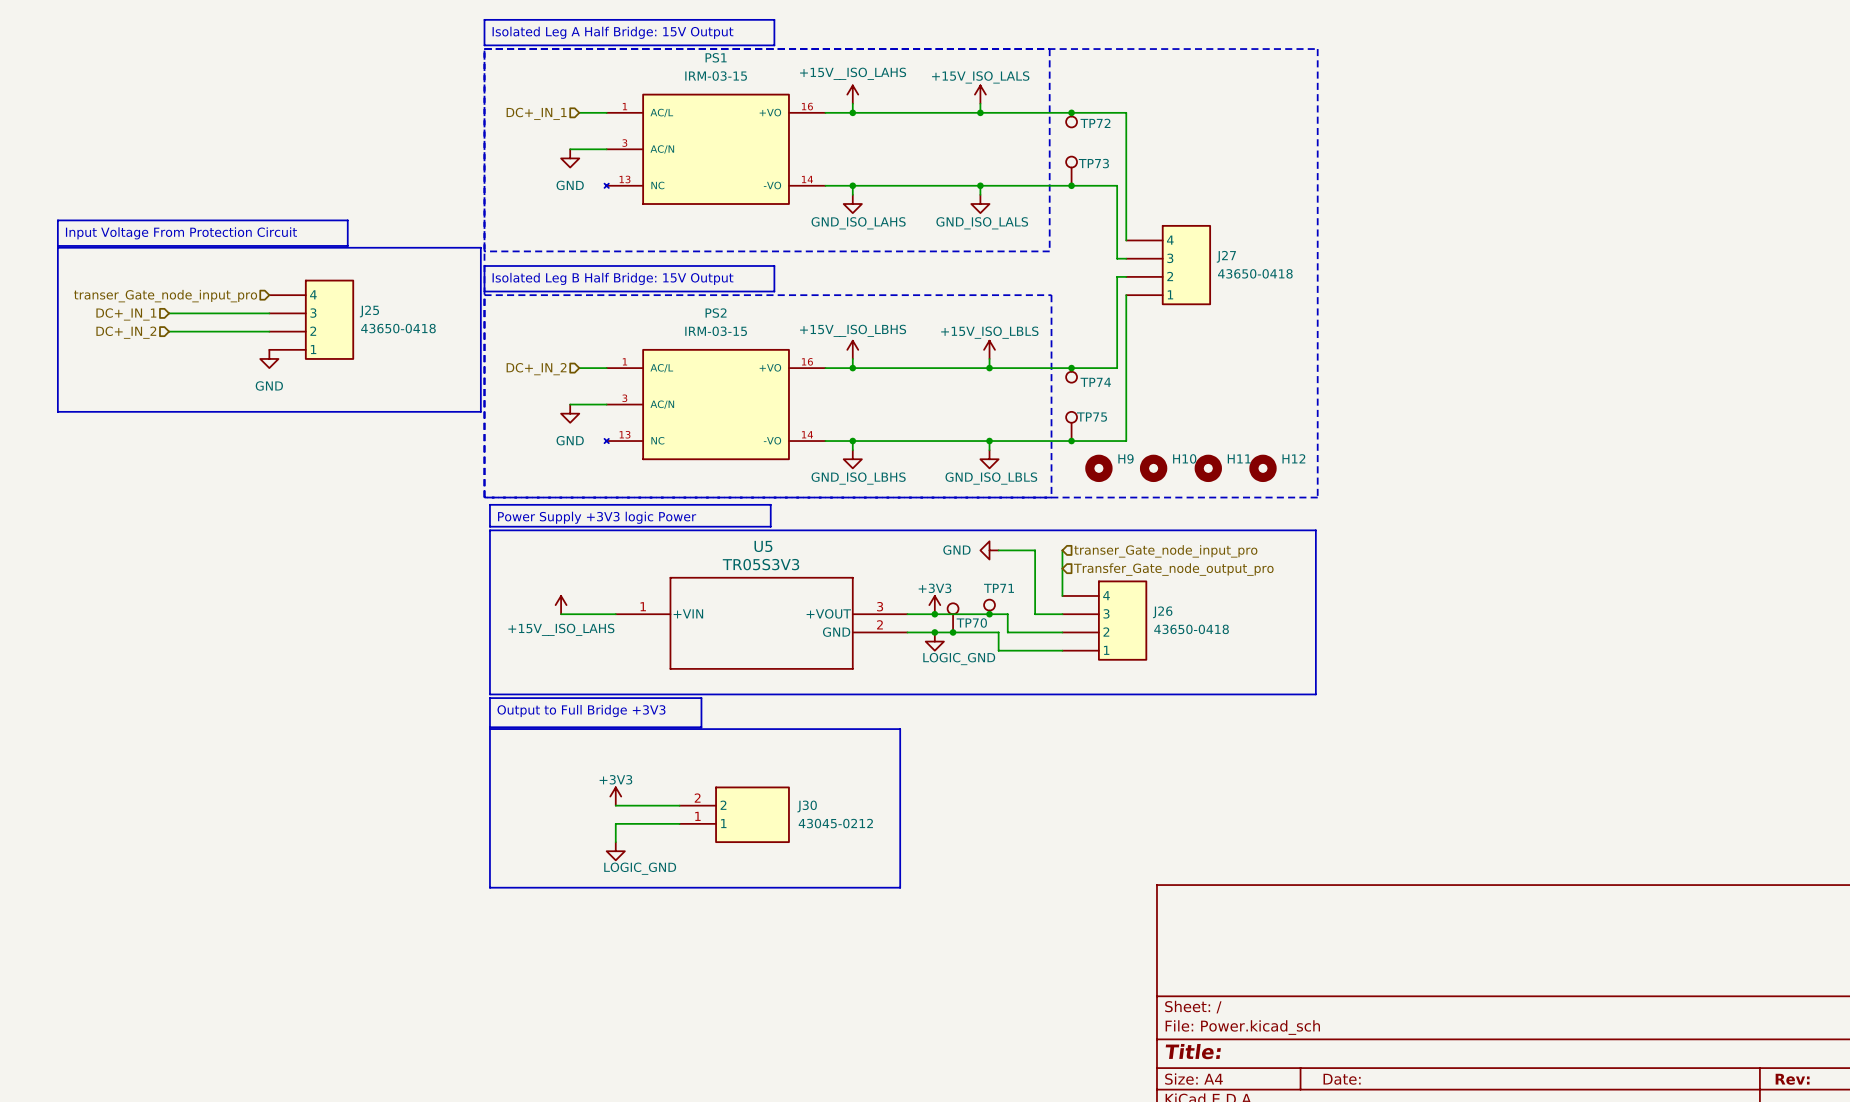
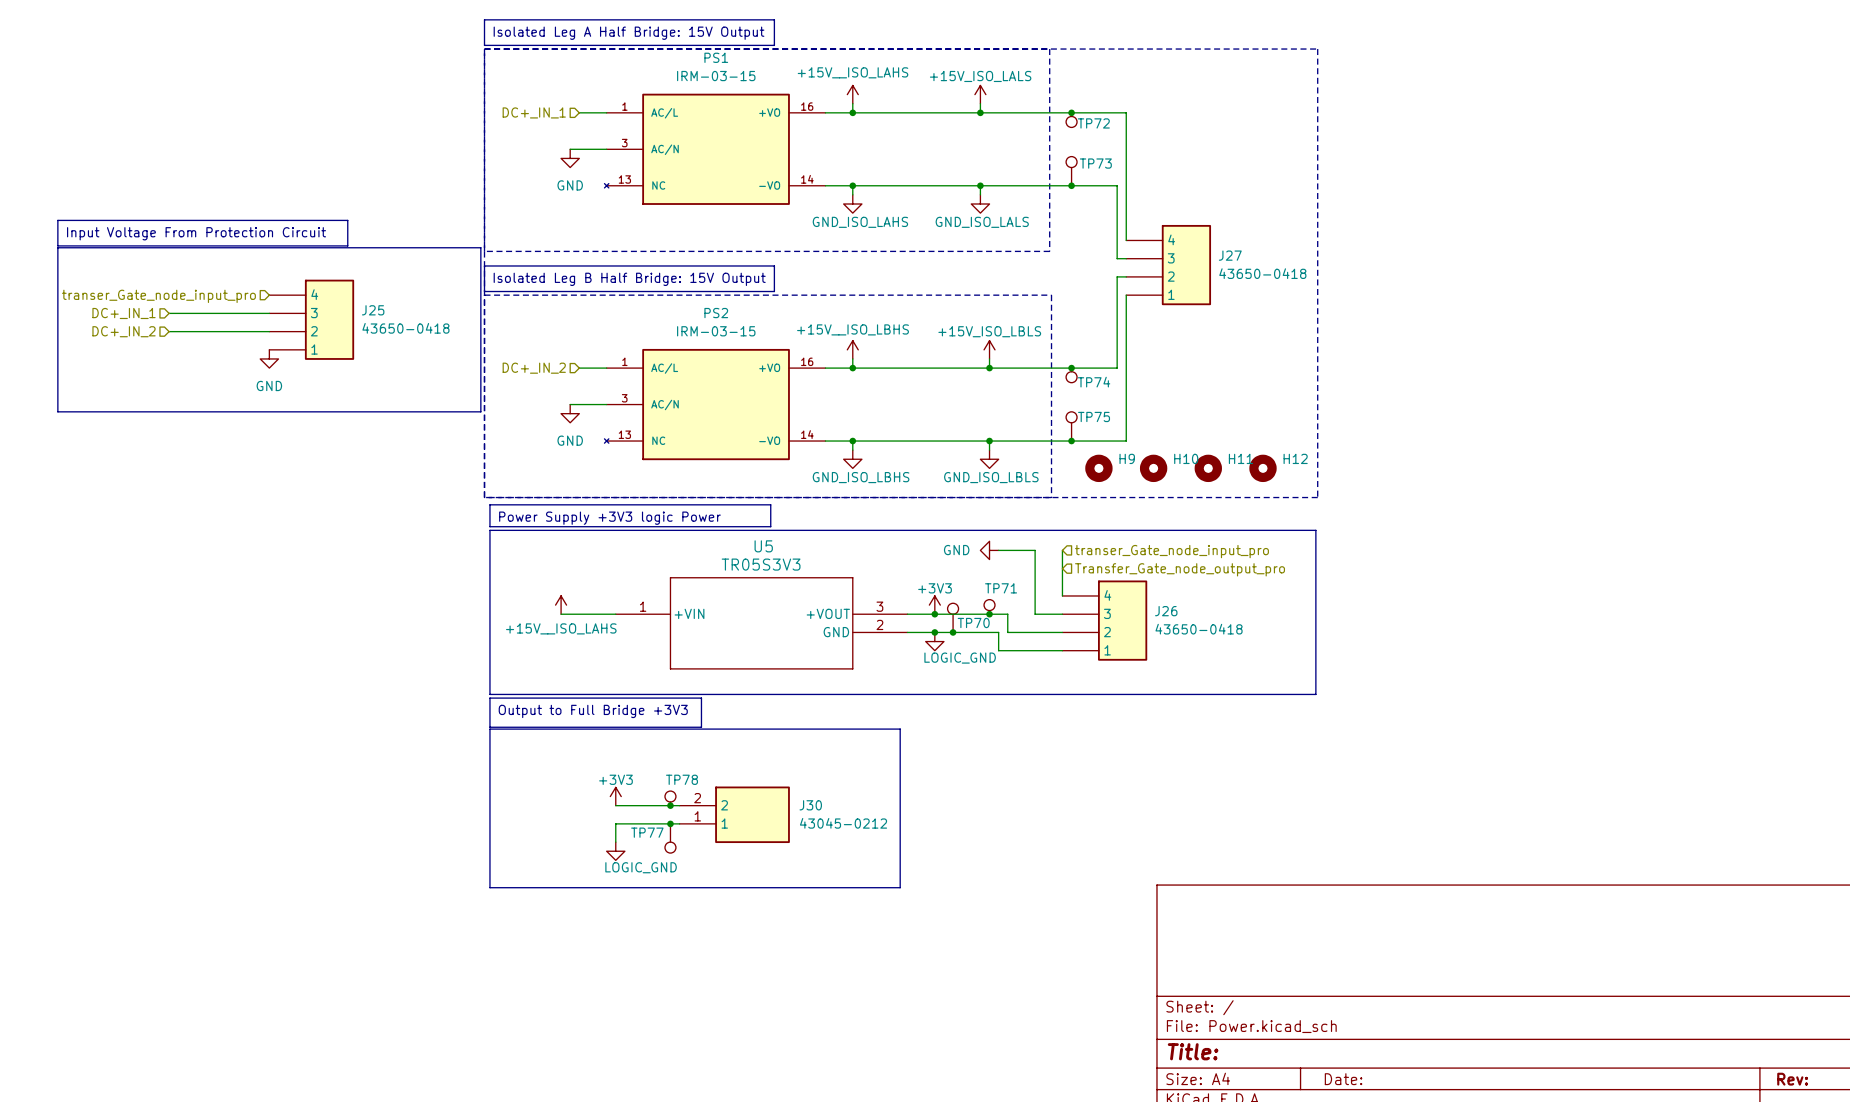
TP78: none -> (670, 798)
junction: none -> (670, 805)
junction: none -> (670, 823)
TP77: none -> (670, 838)

